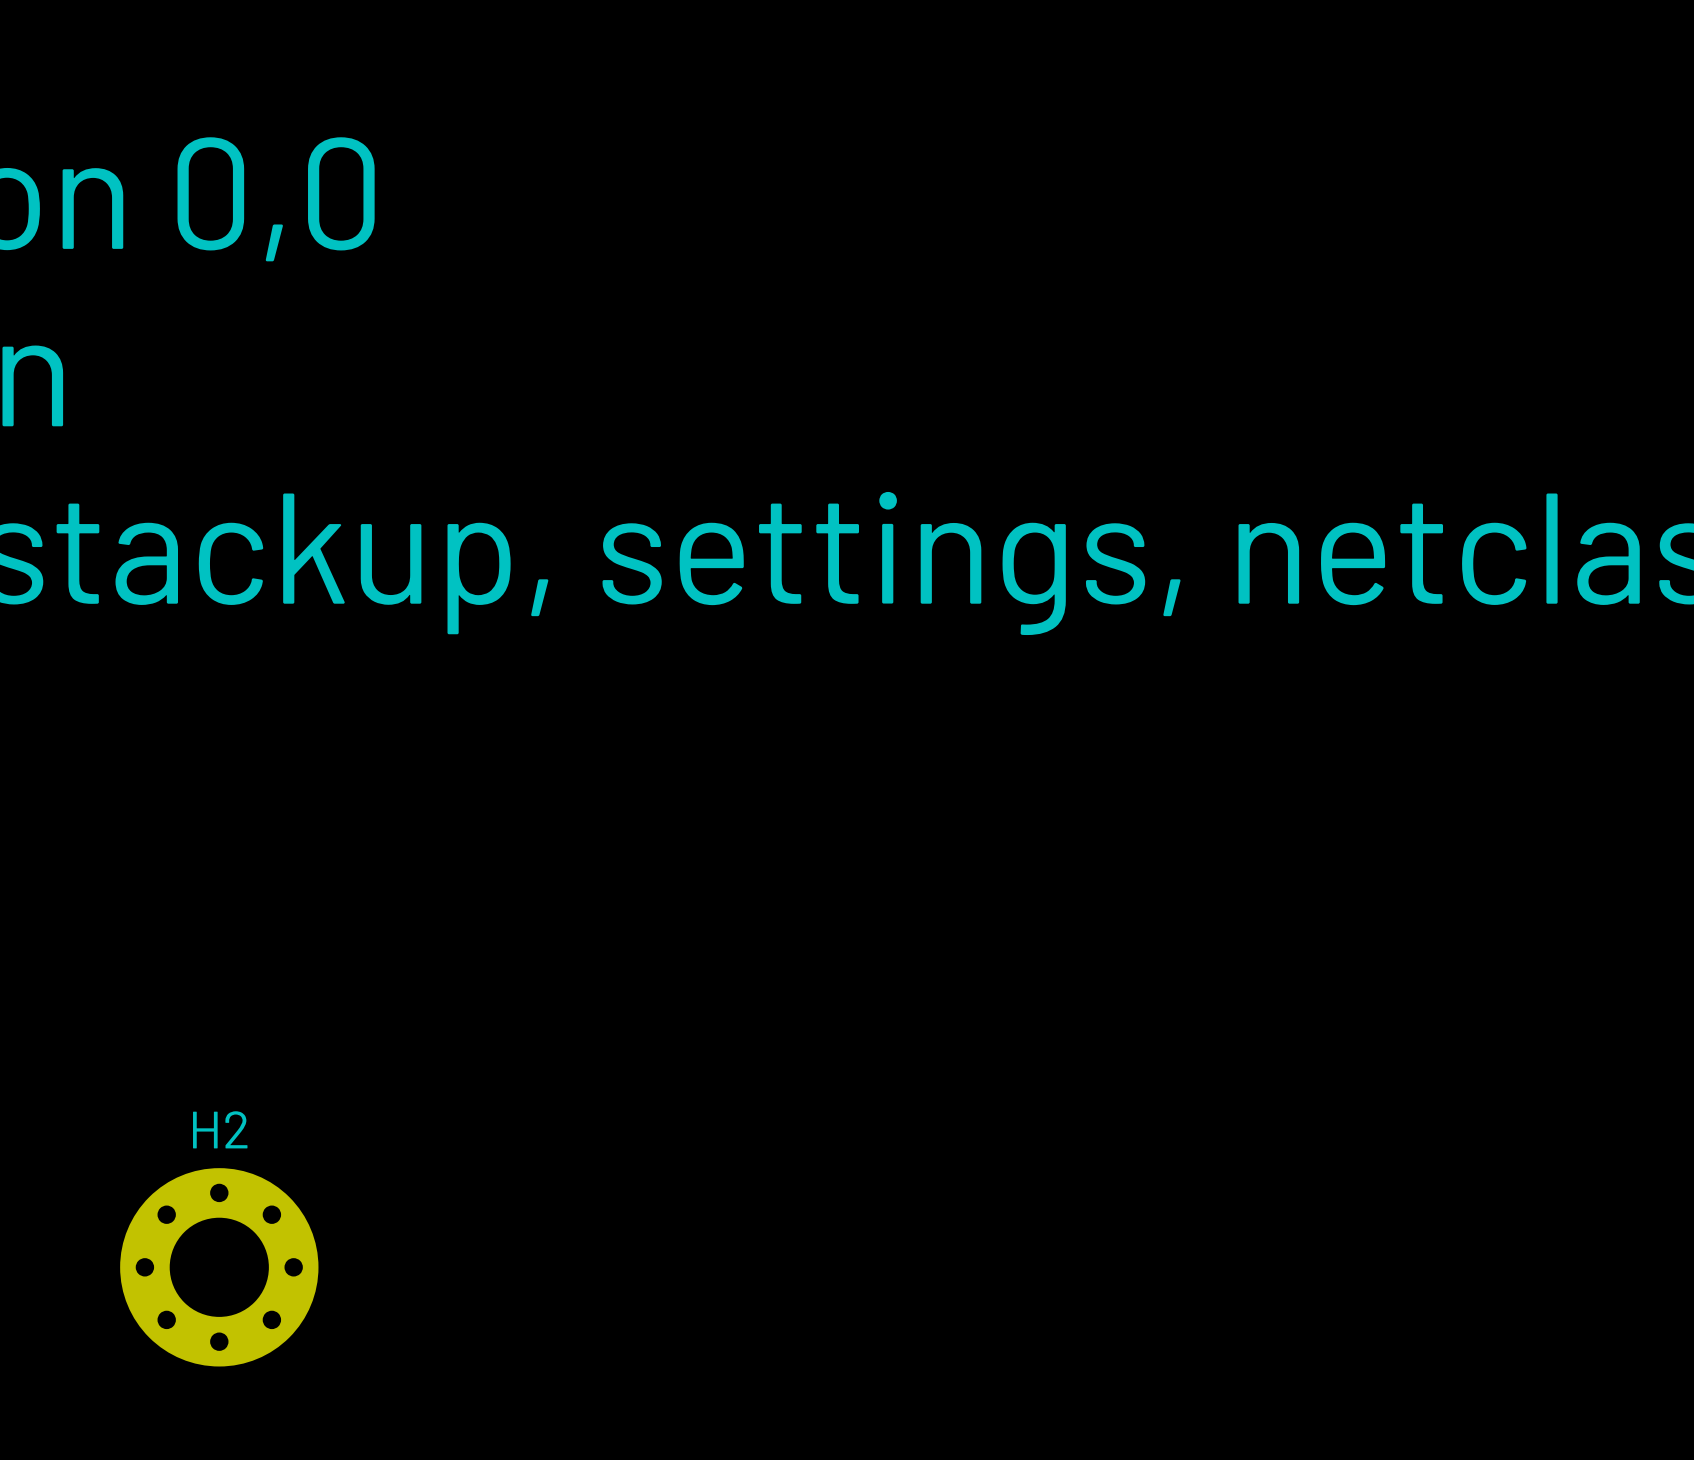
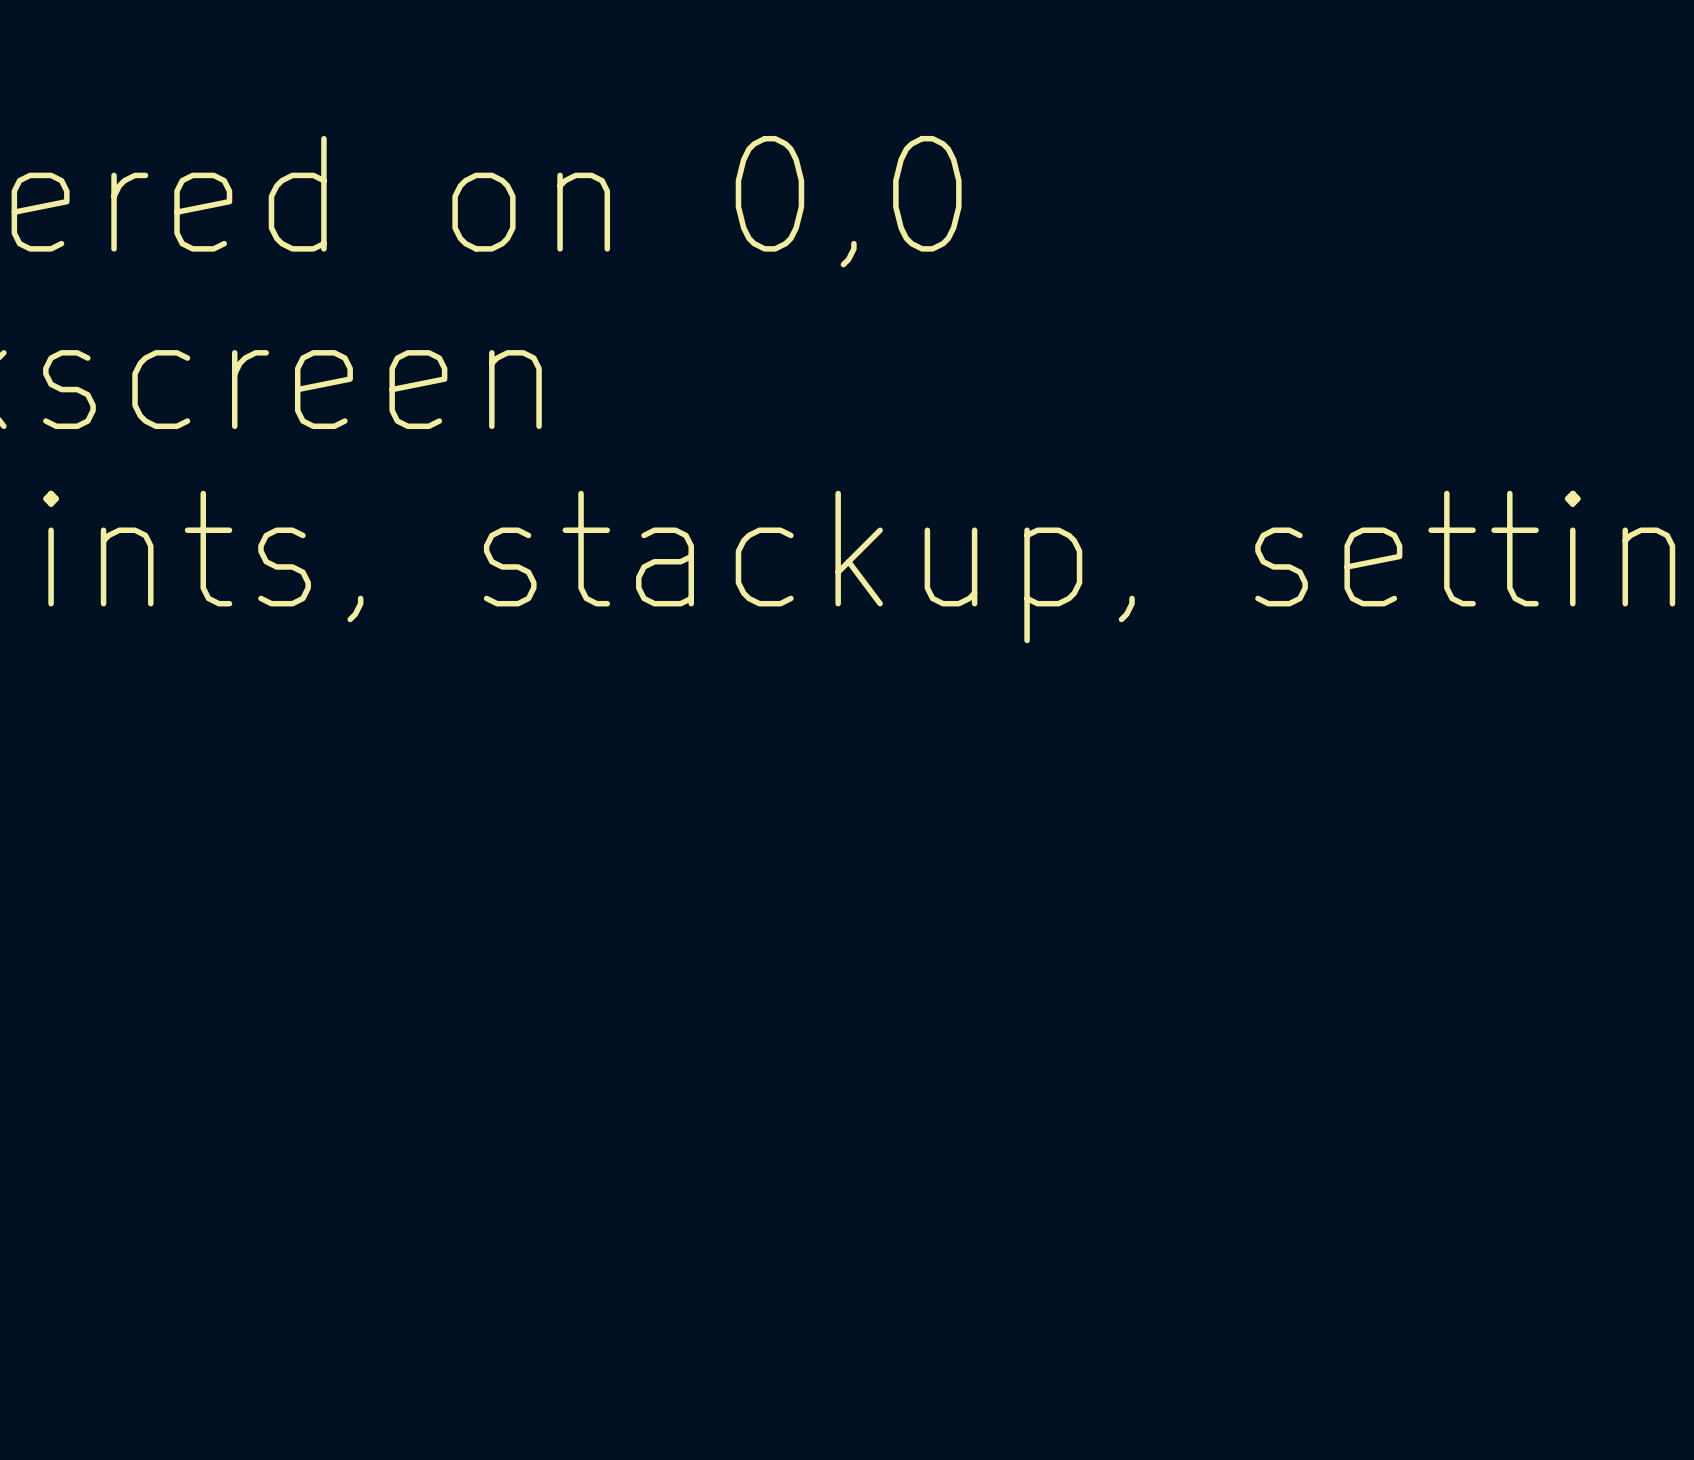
H2: (219, 1267) -> none

